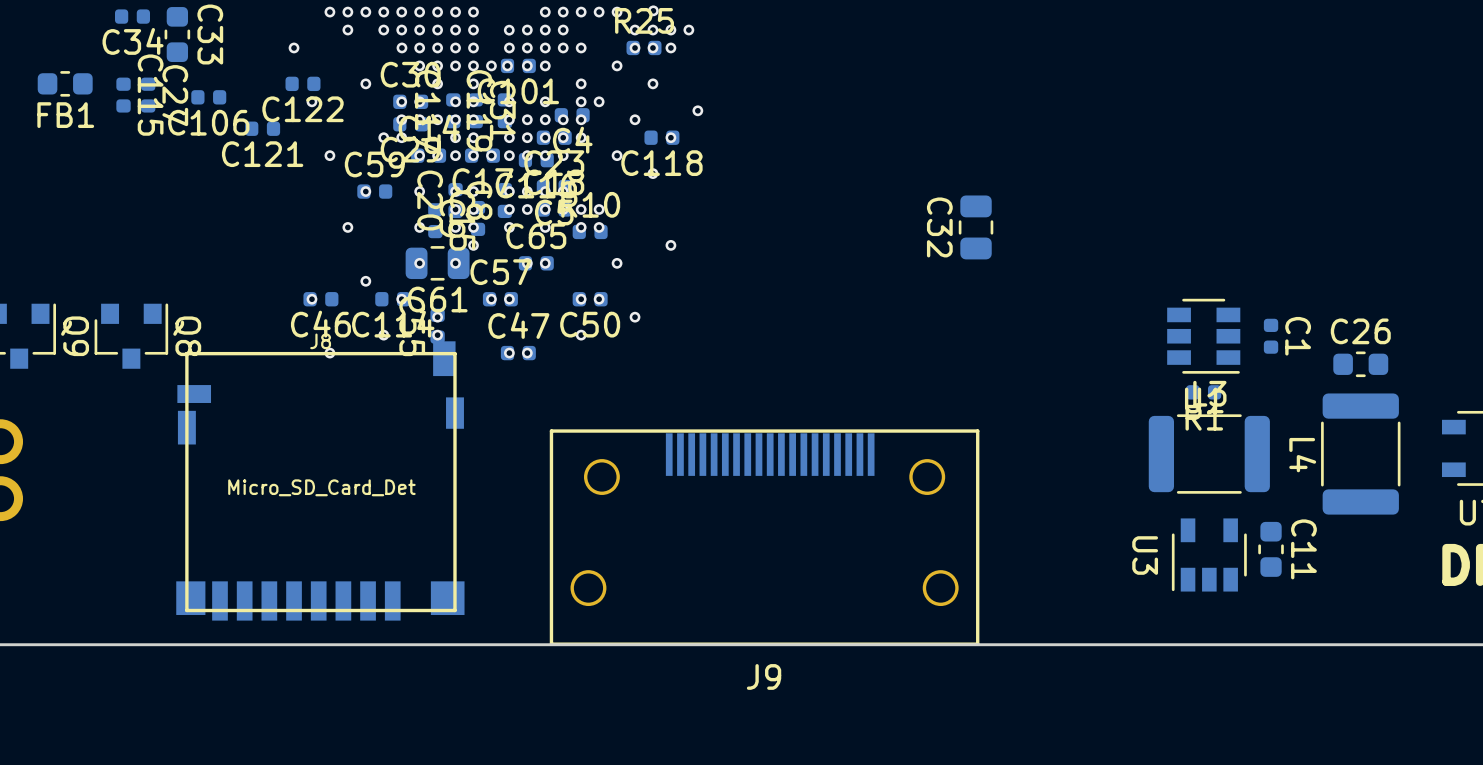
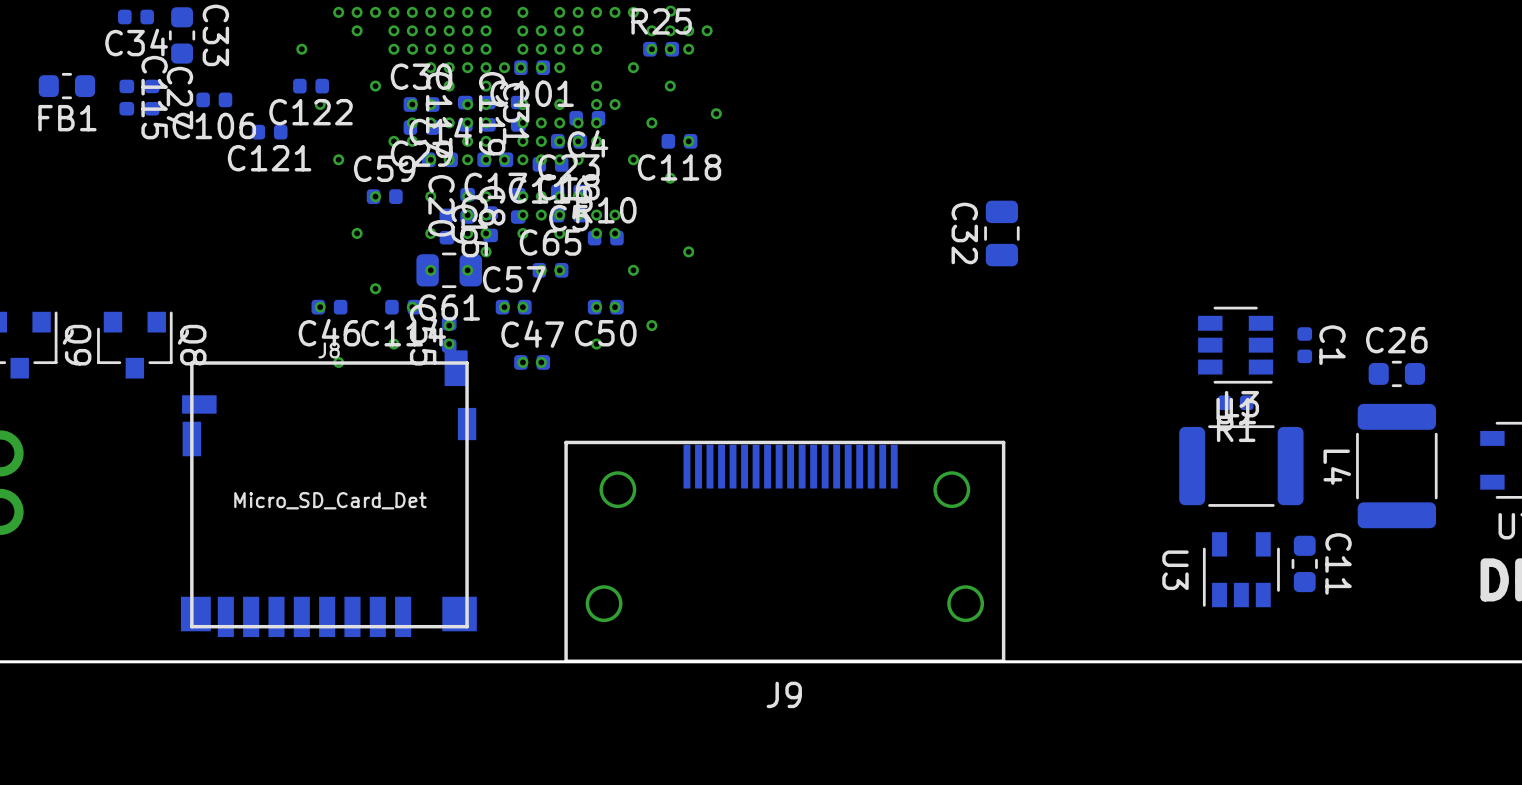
via: none -> (522, 12)
via: none -> (393, 49)

